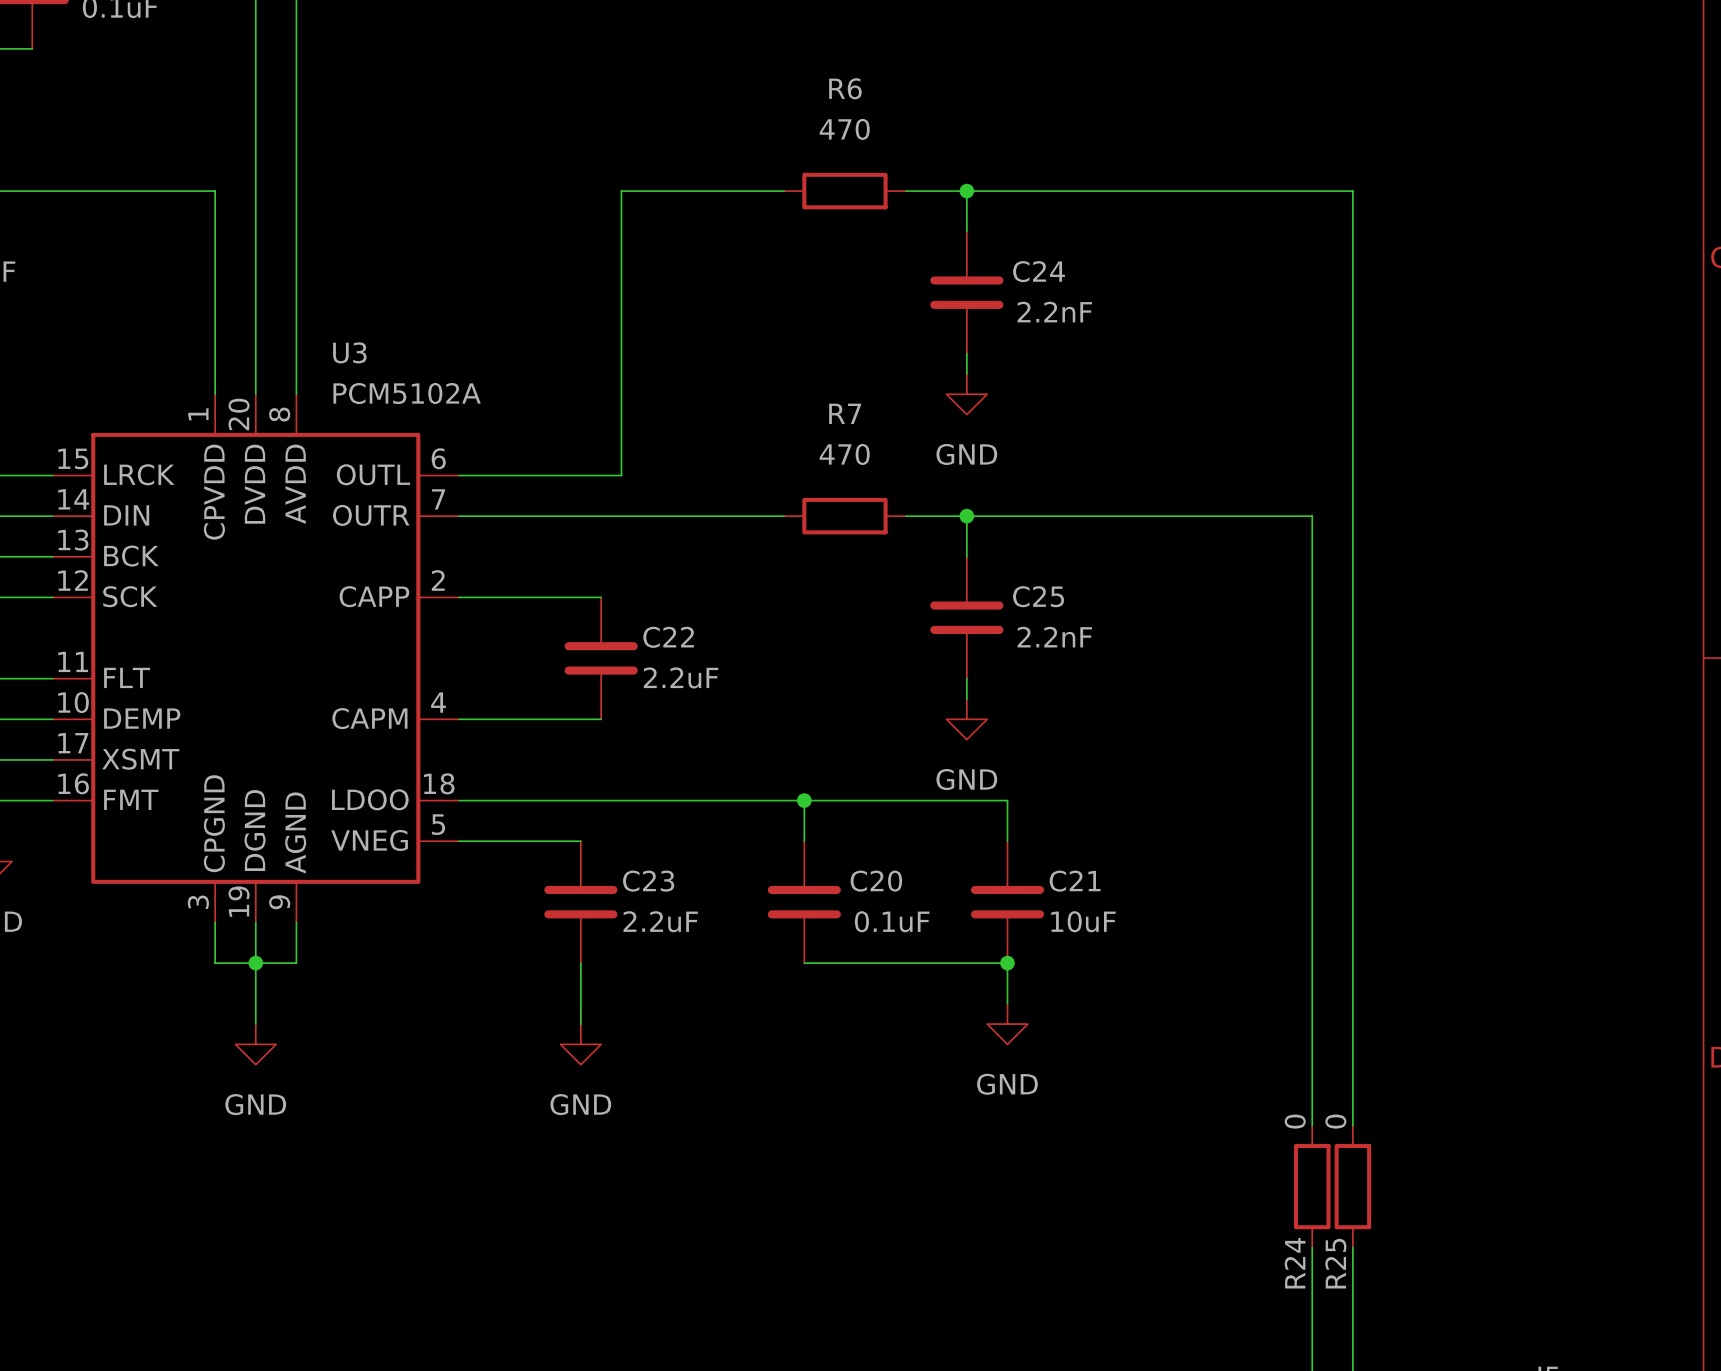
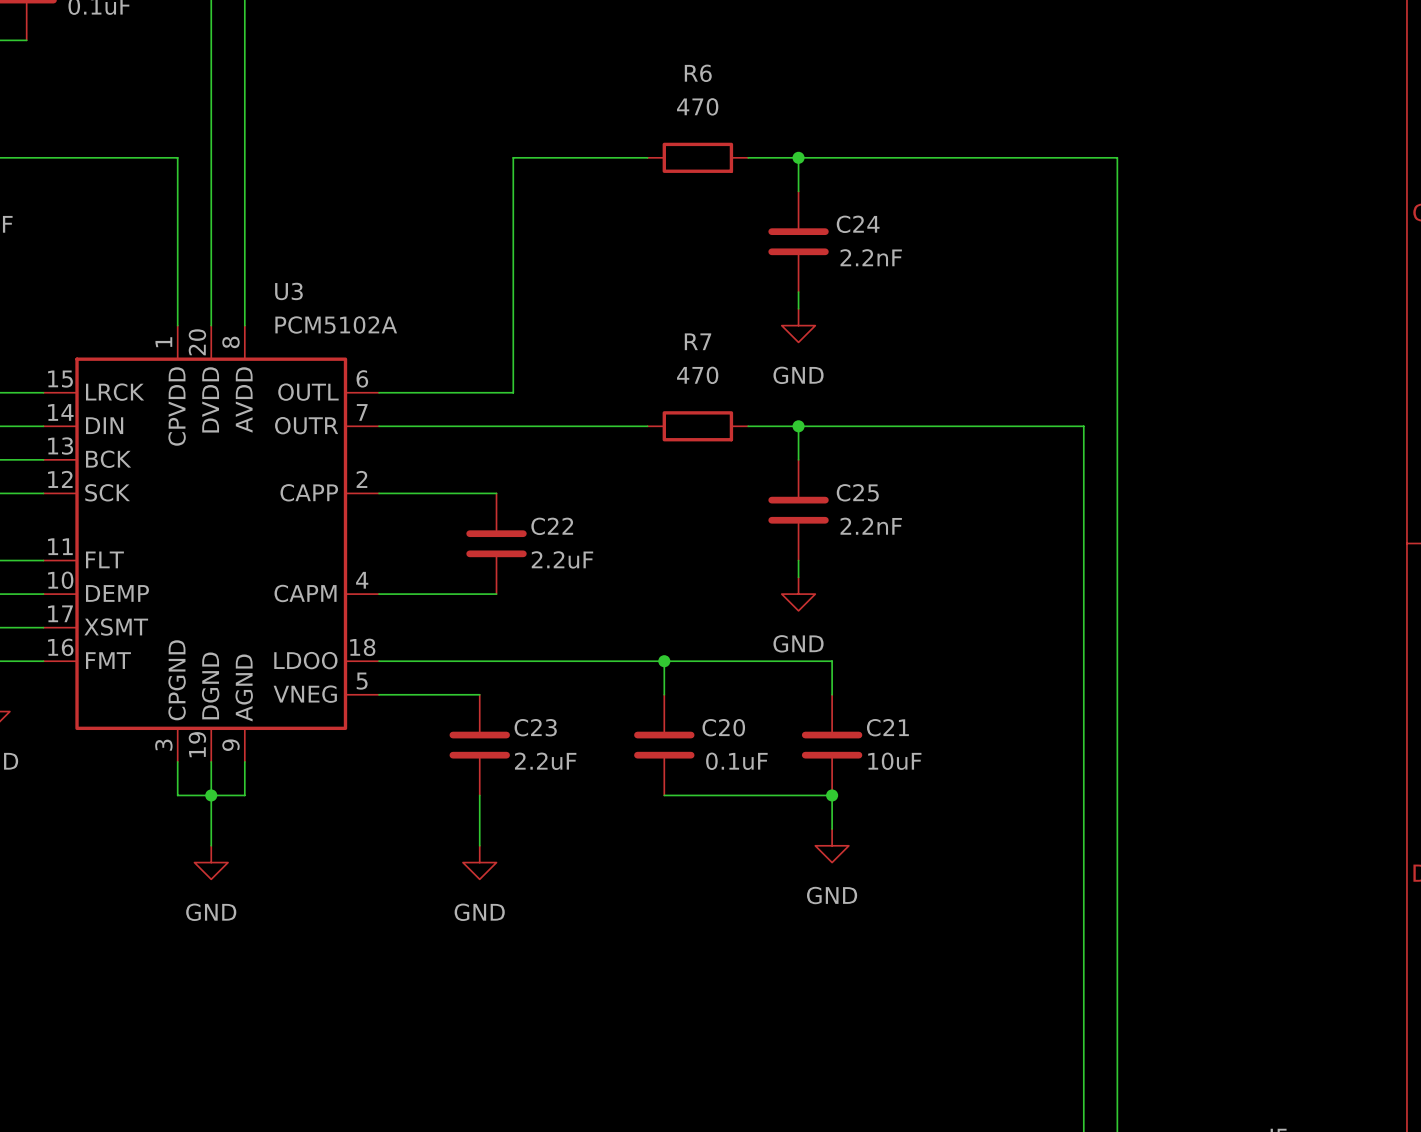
wire: none -> (1083, 929) (1083, 1030)
wire: none -> (1117, 929) (1117, 1030)
R24: 0 (1312, 1186) -> none
R25: 0 (1352, 1186) -> none

